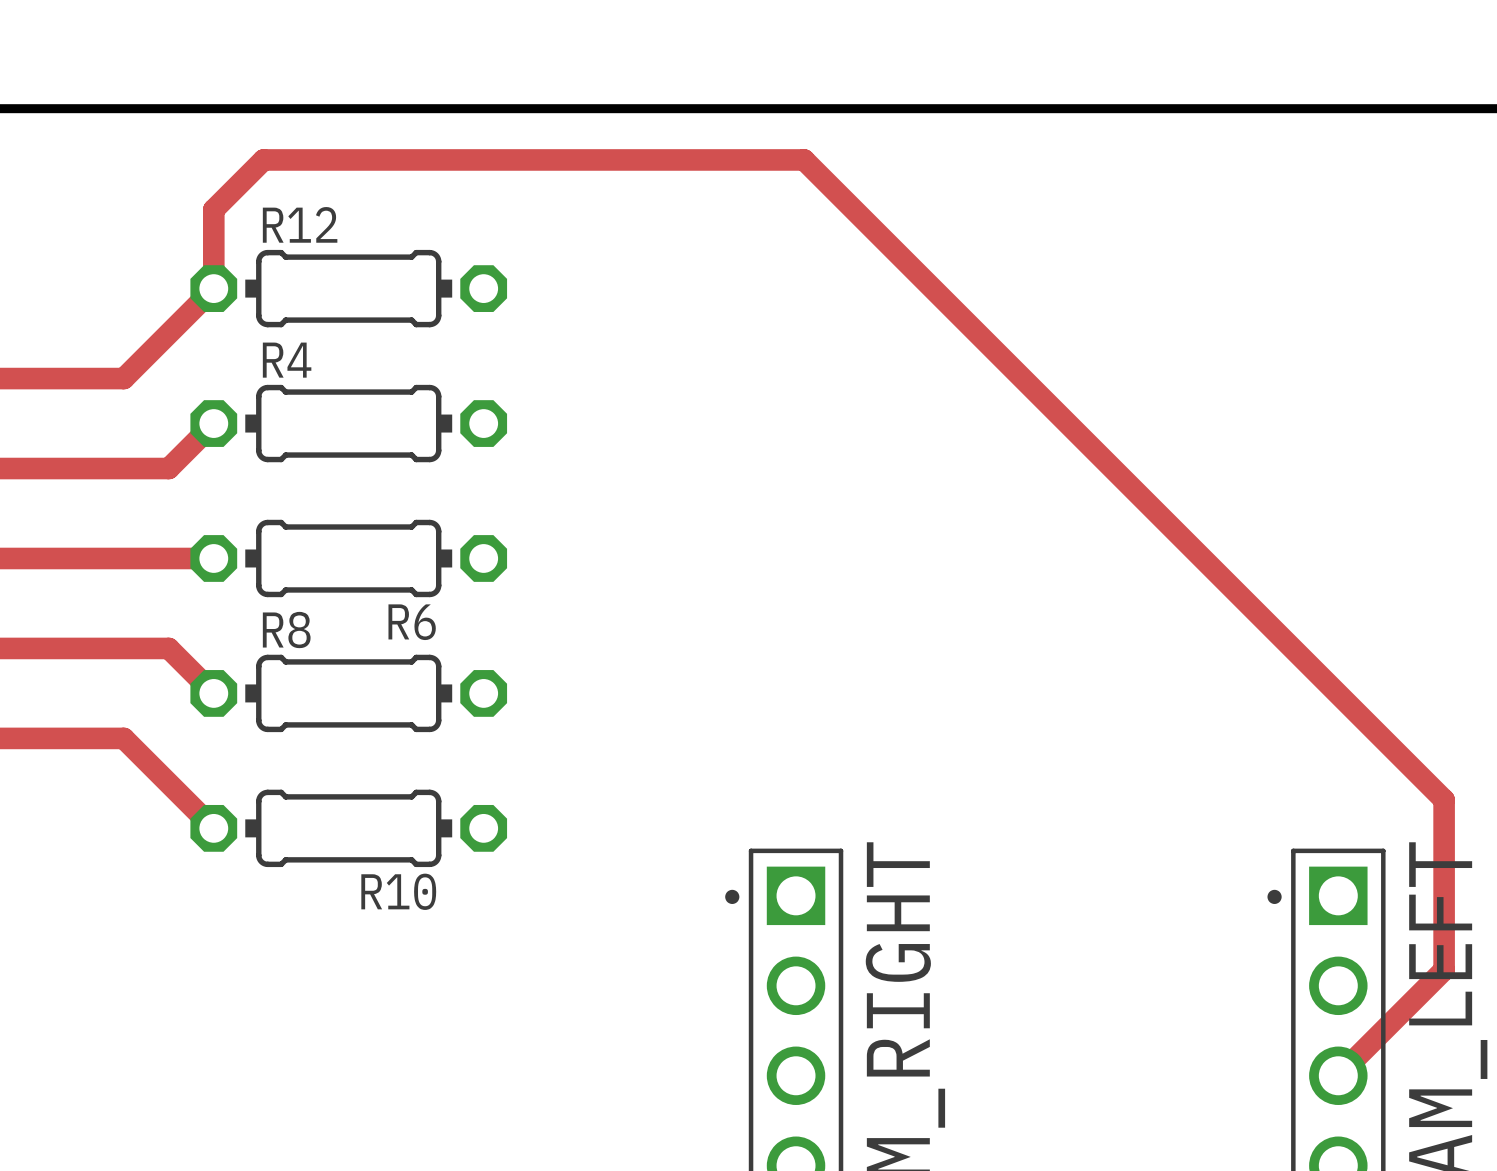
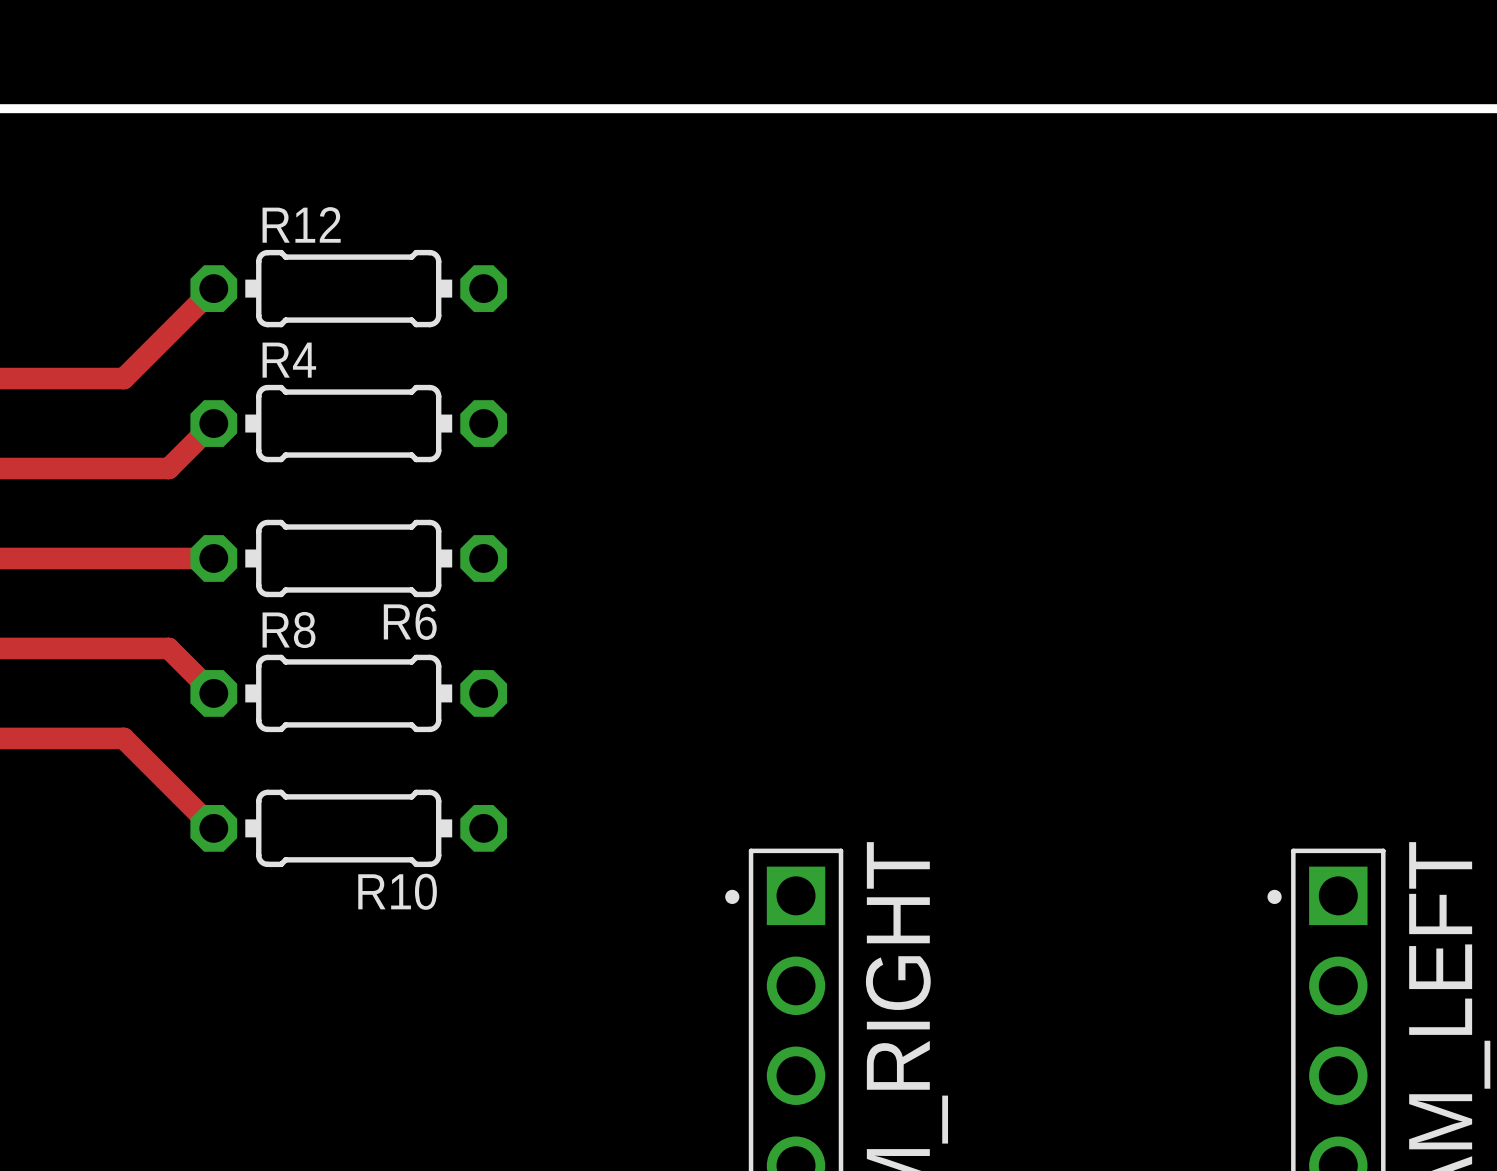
track: (213, 288) (213, 209) (263, 159) (804, 159) (1444, 799) (1444, 969) (1338, 1075) -> none

